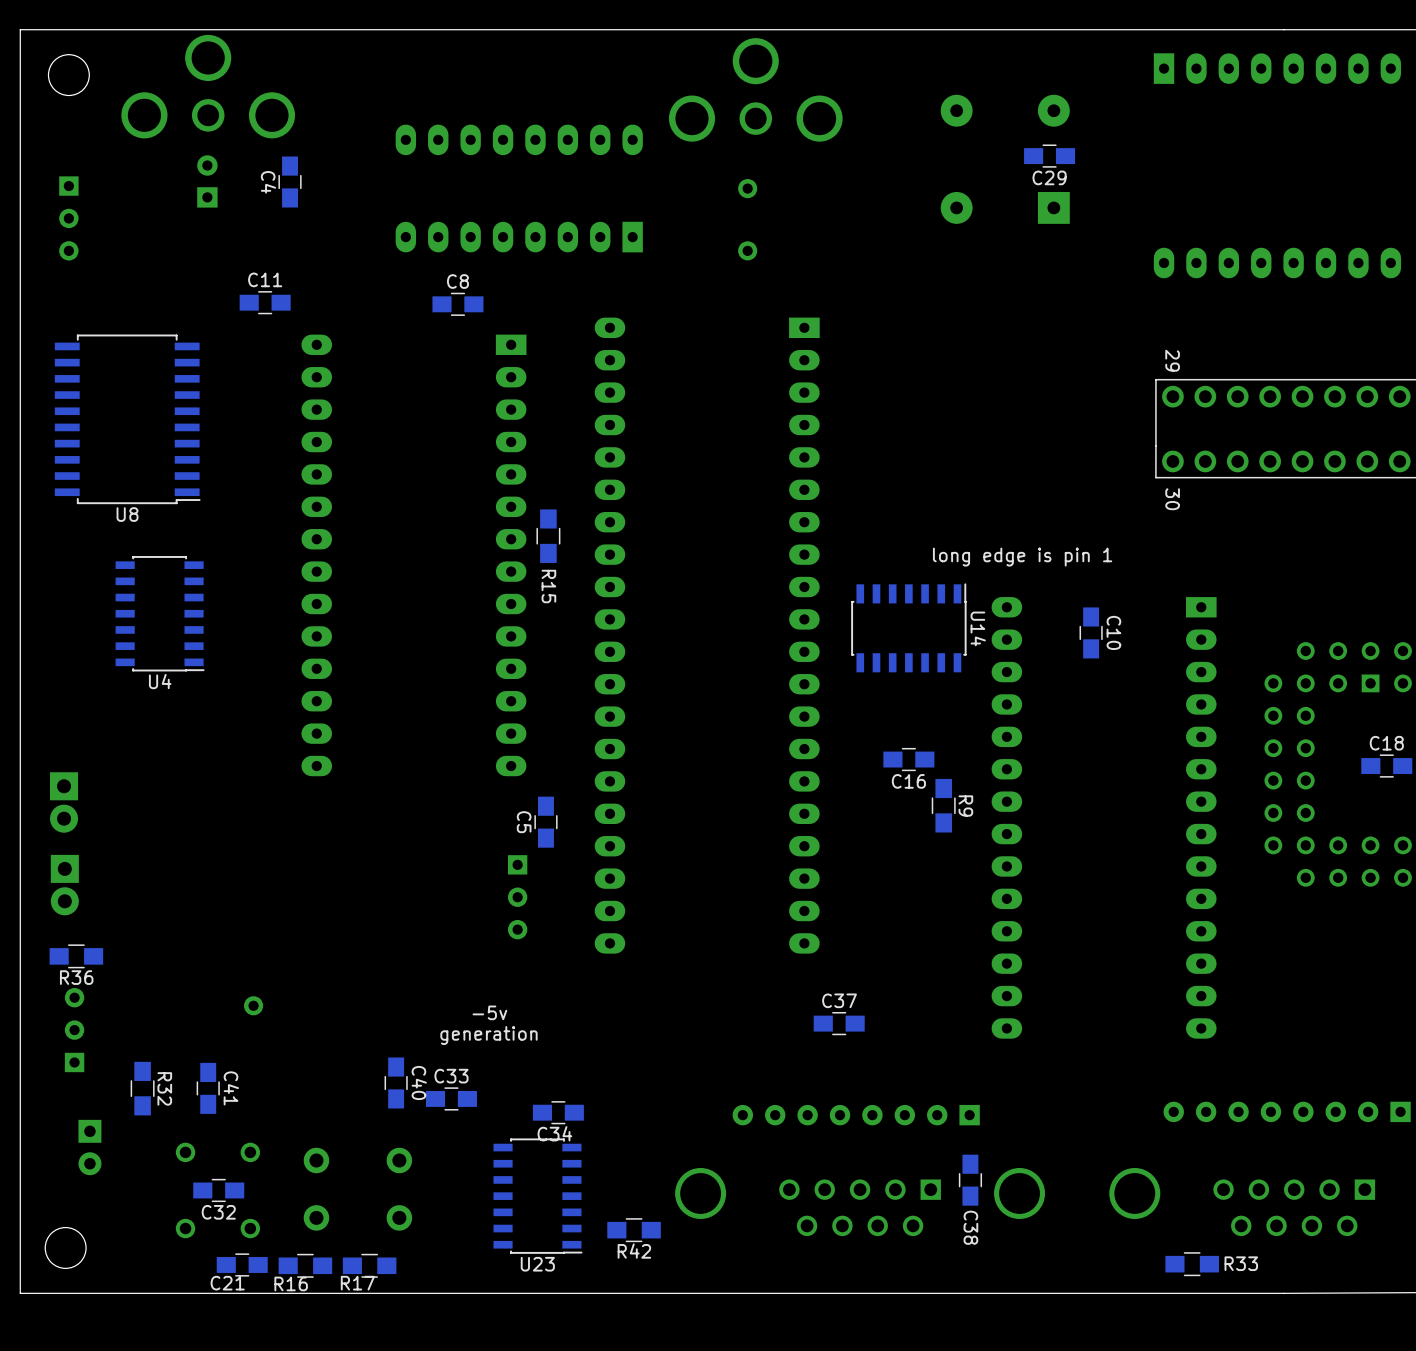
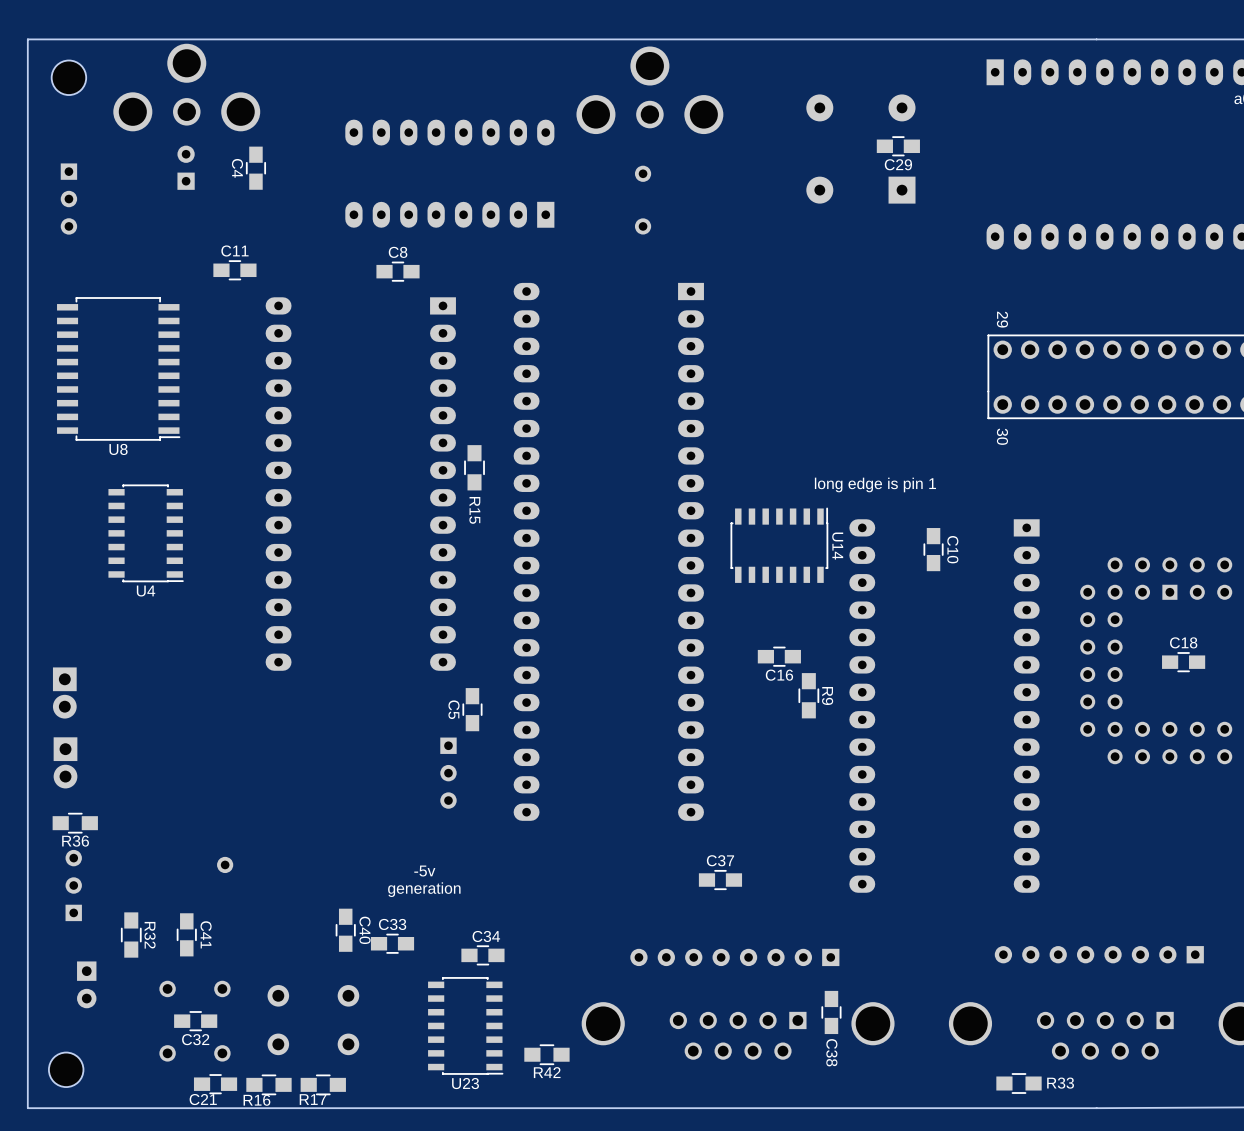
C34 name position: C34 (554, 1133) -> C34 (486, 936)

